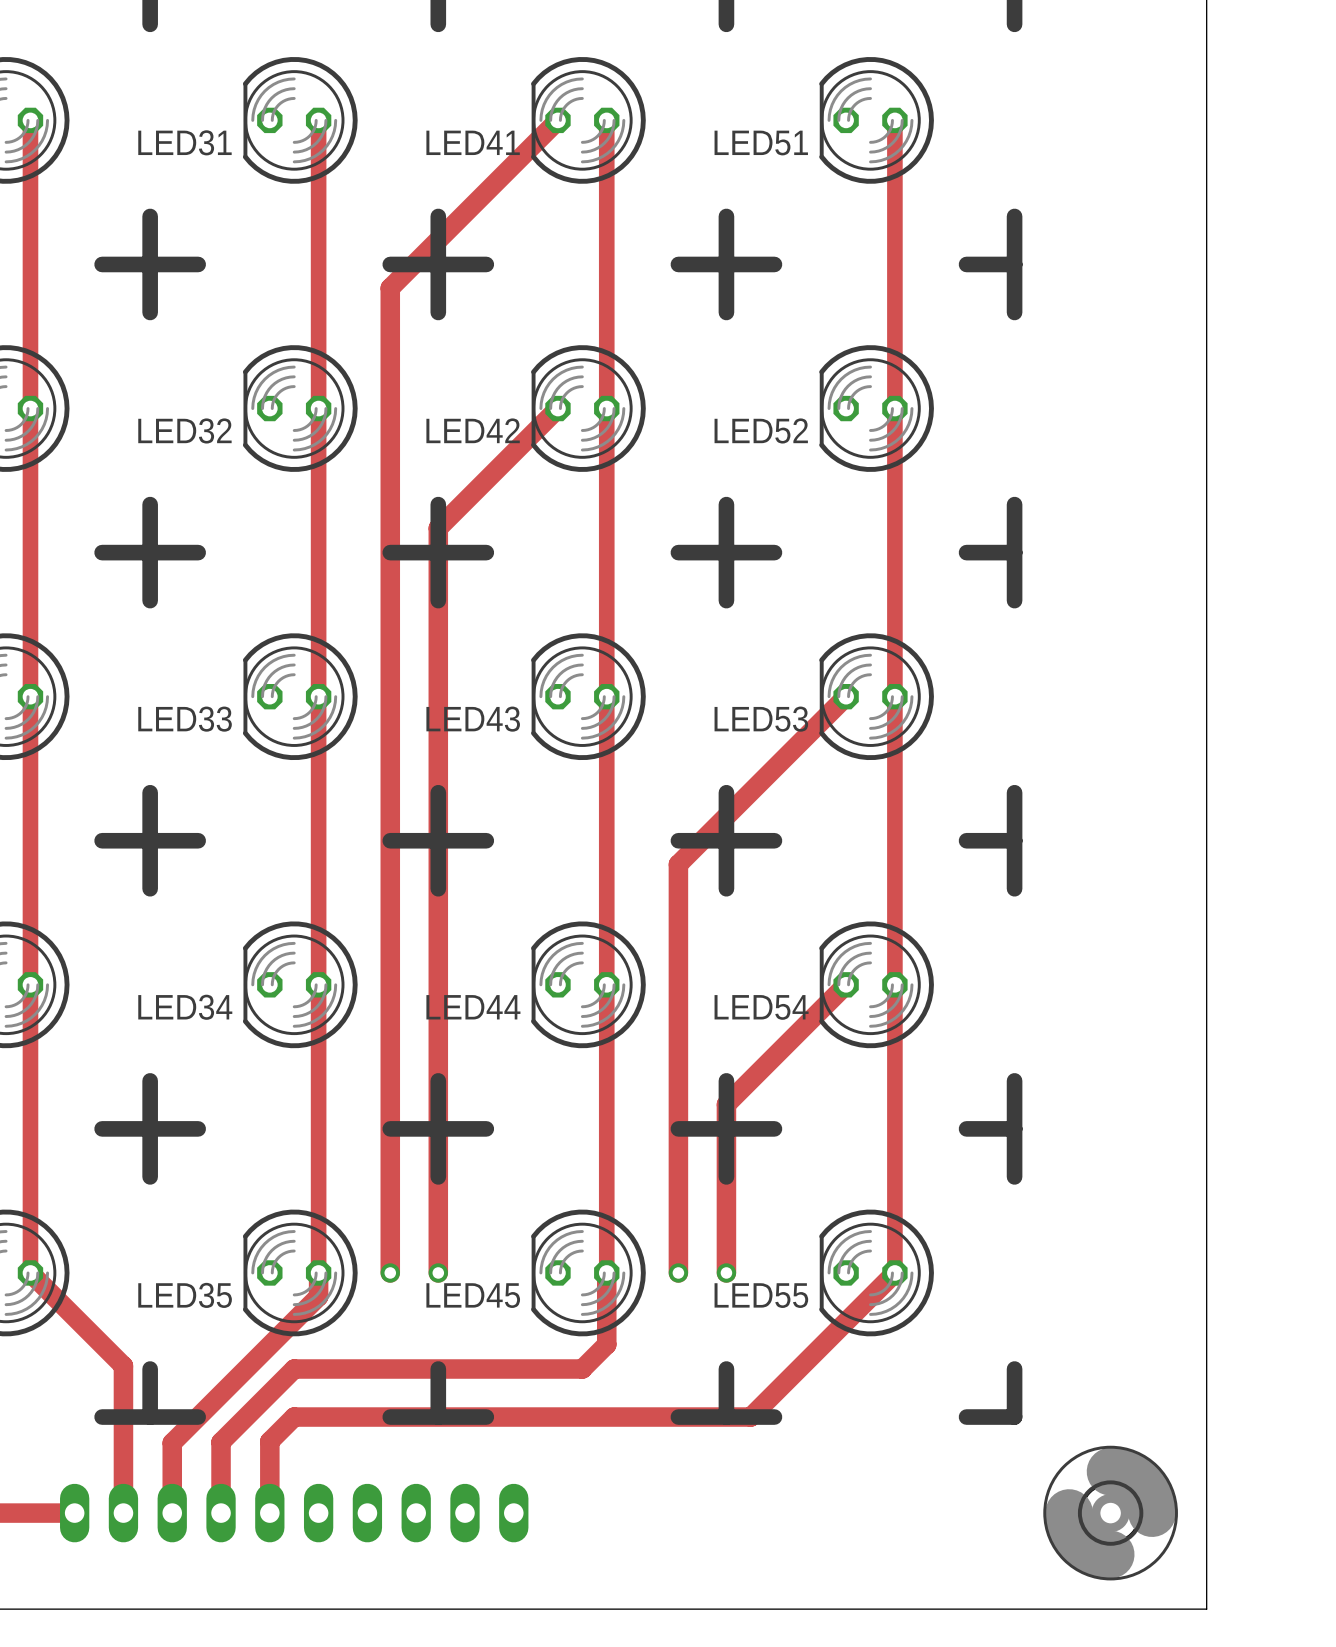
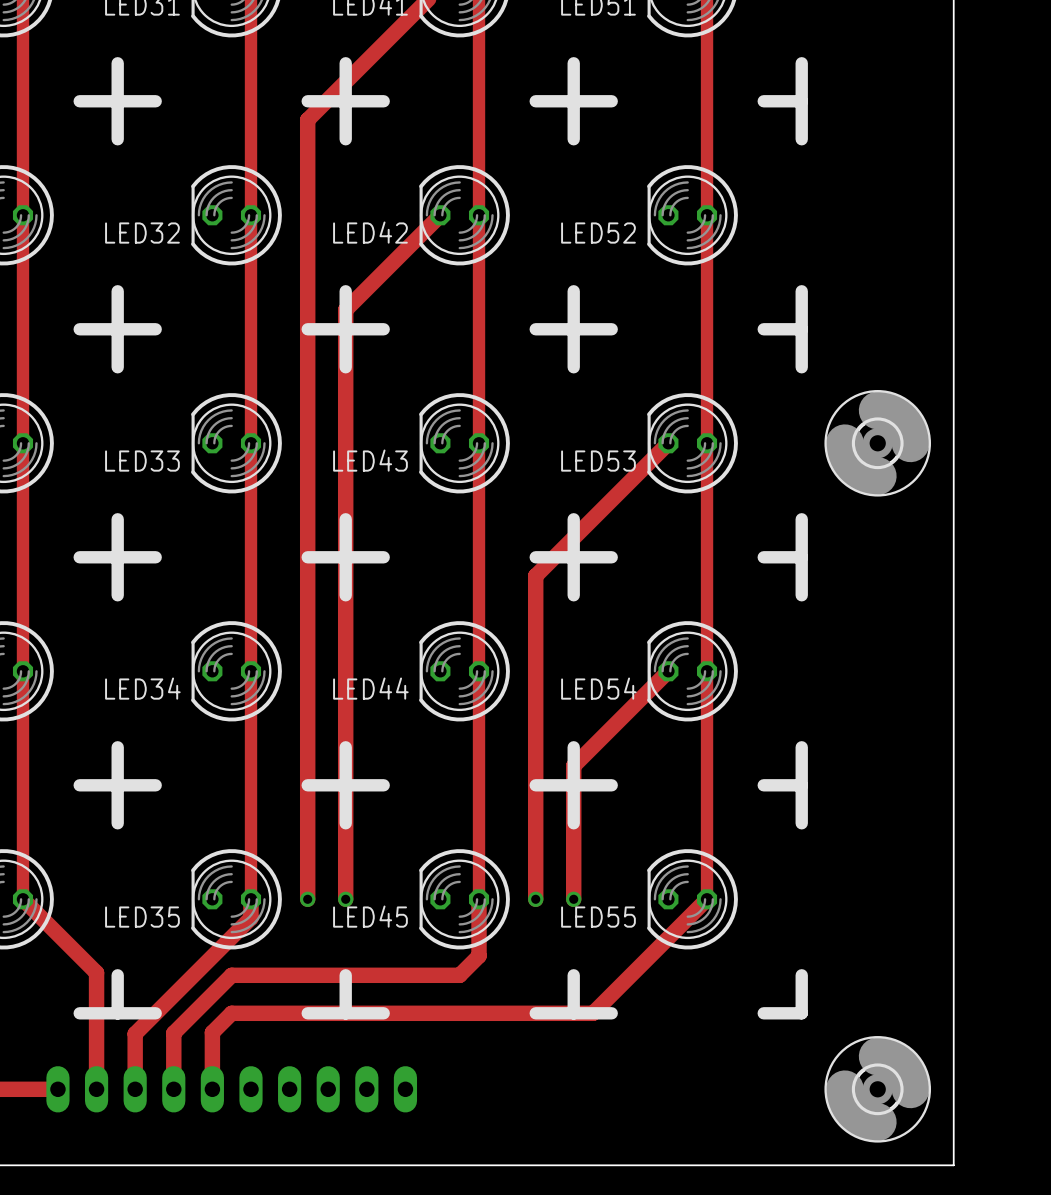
part: none -> (877, 443)

